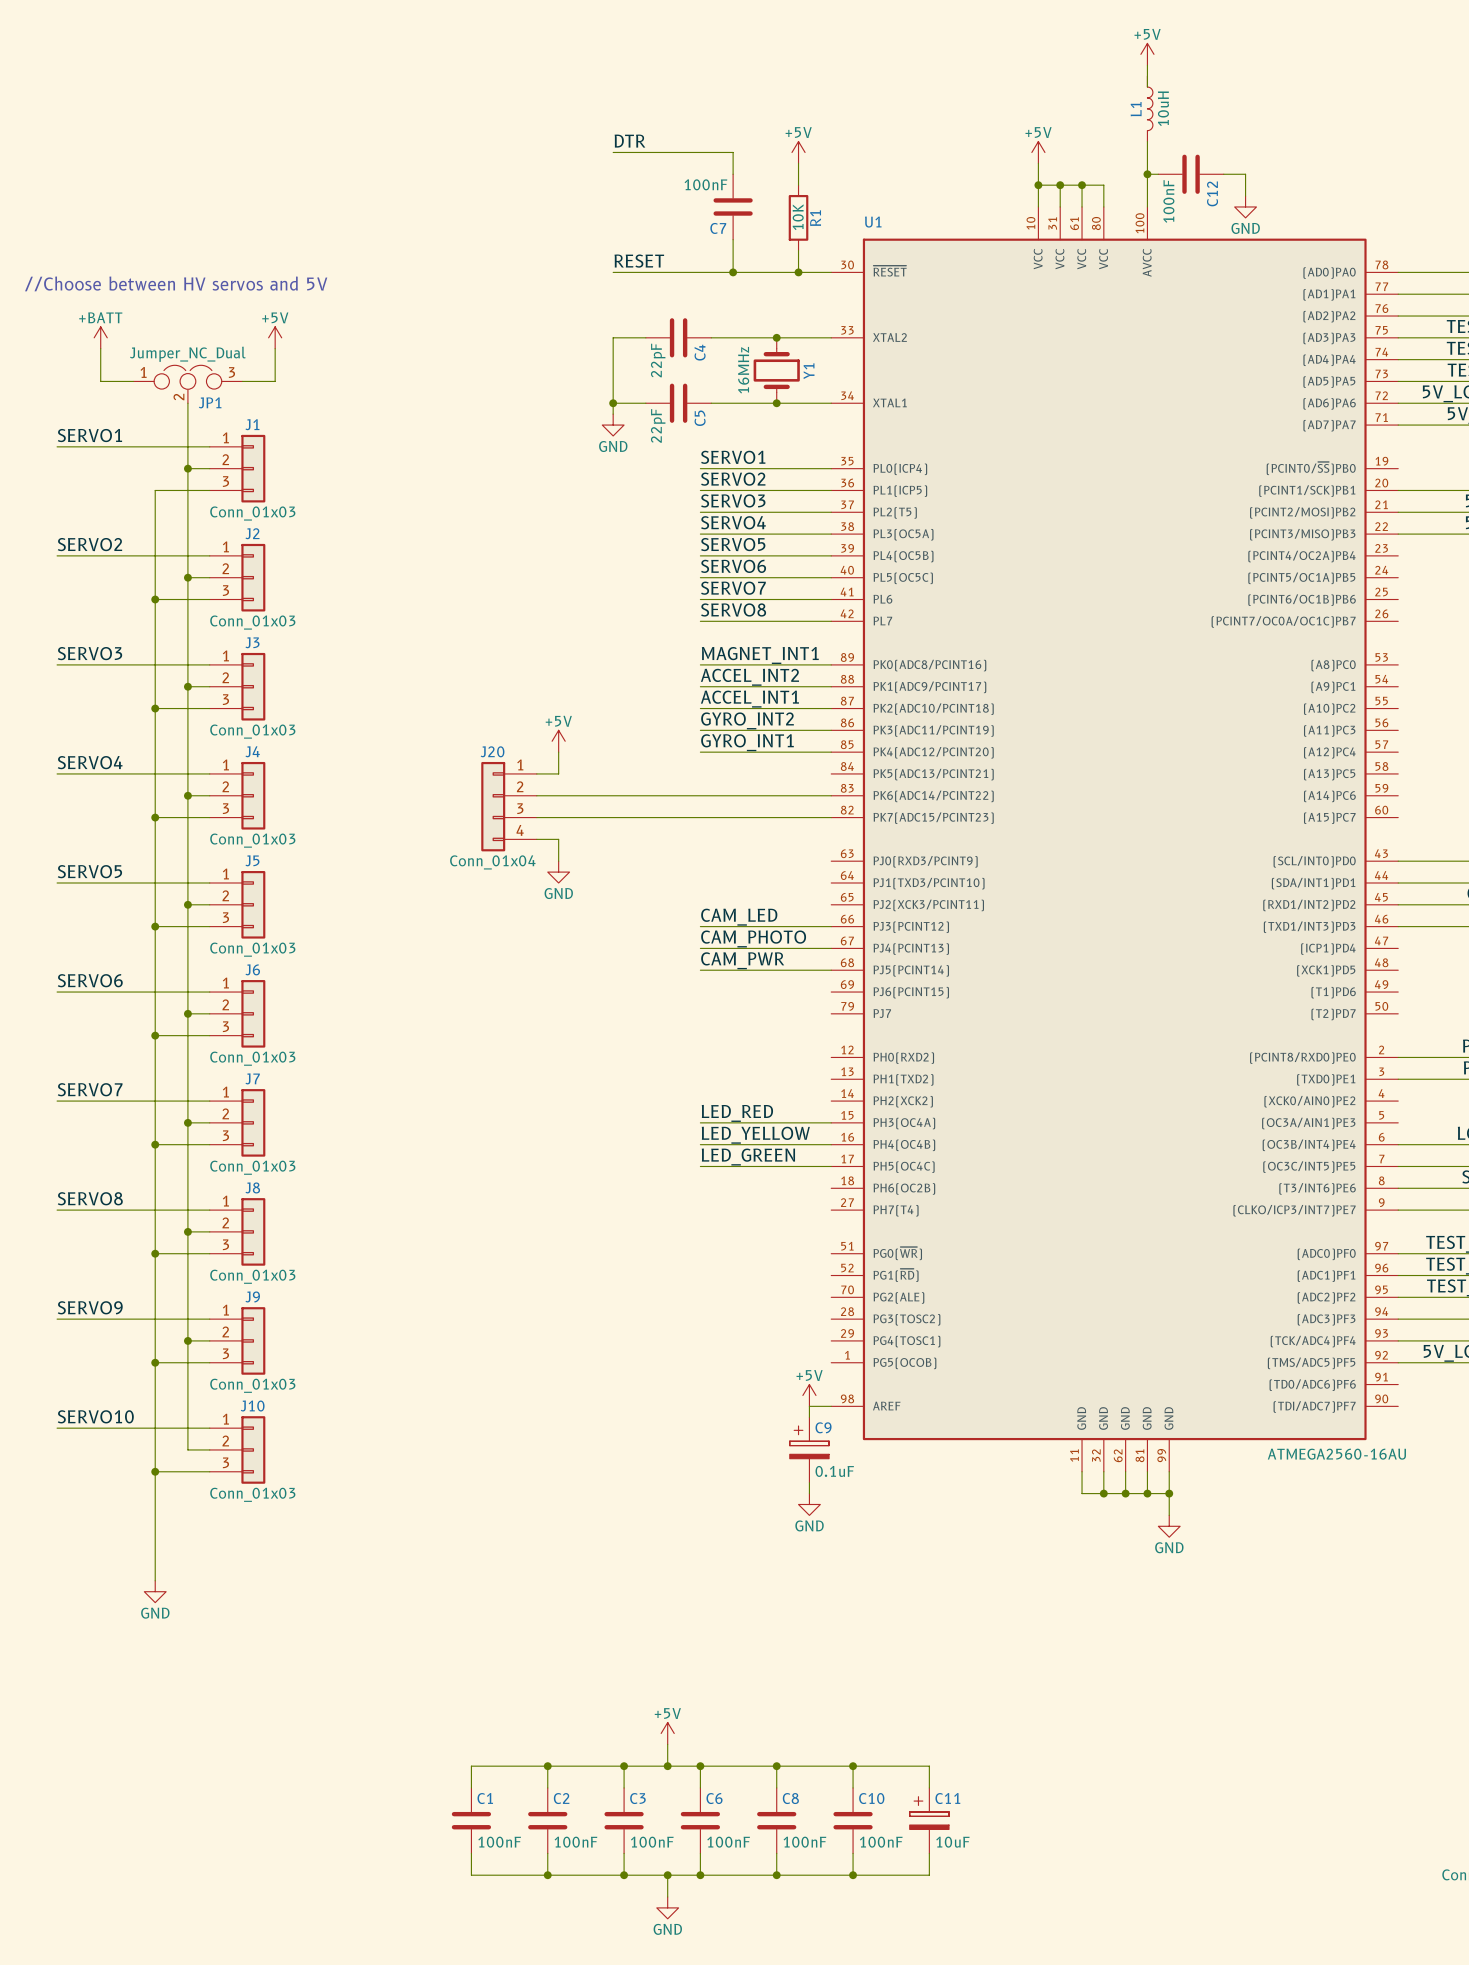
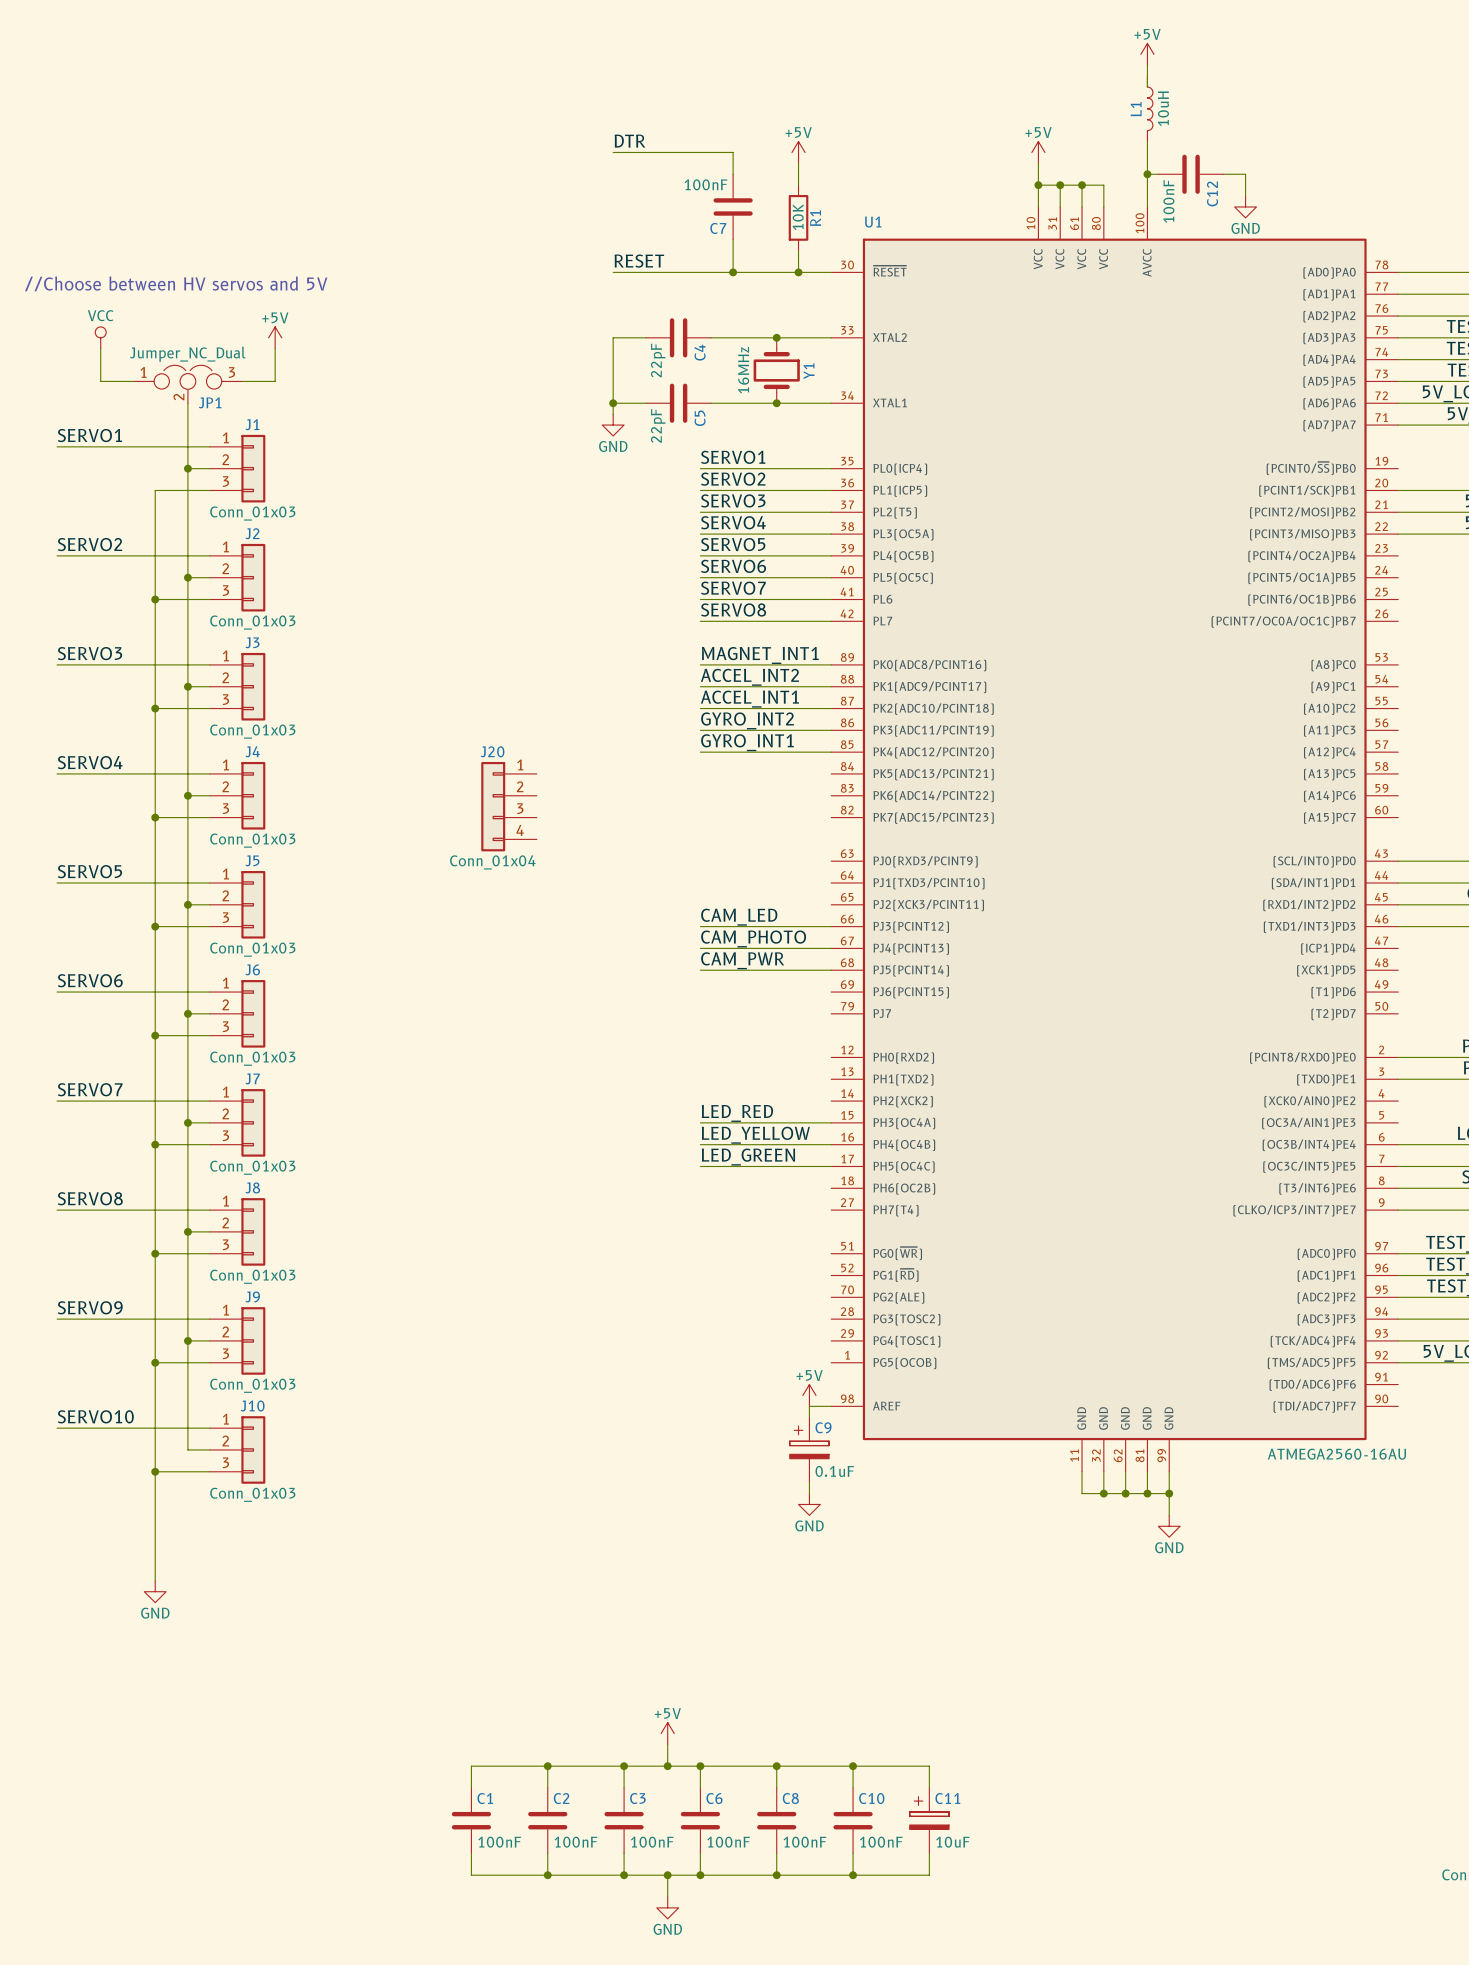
power symbol: +BATT (100, 337) -> VCC (100, 337)
power symbol: +5V (558, 741) -> none
wire: (558, 752) (558, 773) (536, 773) -> none
wire: (536, 795) (831, 795) -> none
wire: (536, 817) (831, 817) -> none
wire: (536, 839) (558, 839) (558, 861) -> none
power symbol: GND (558, 872) -> none

